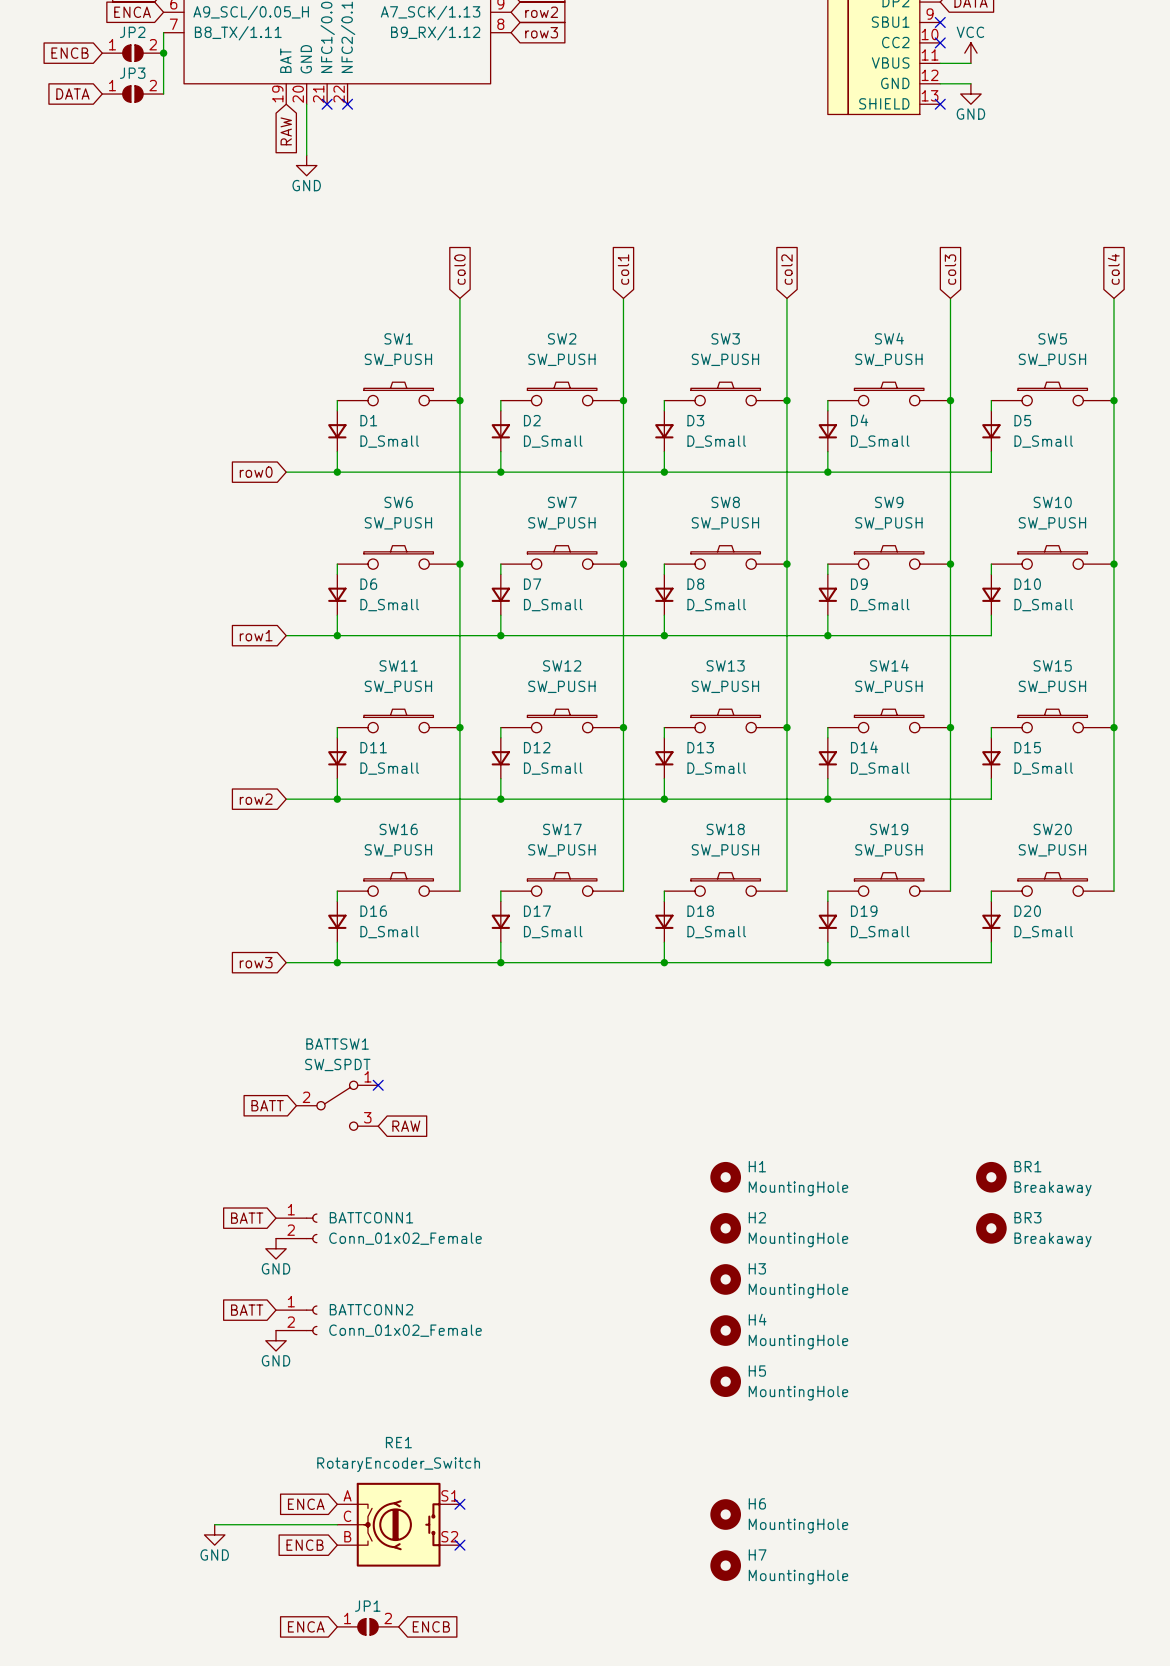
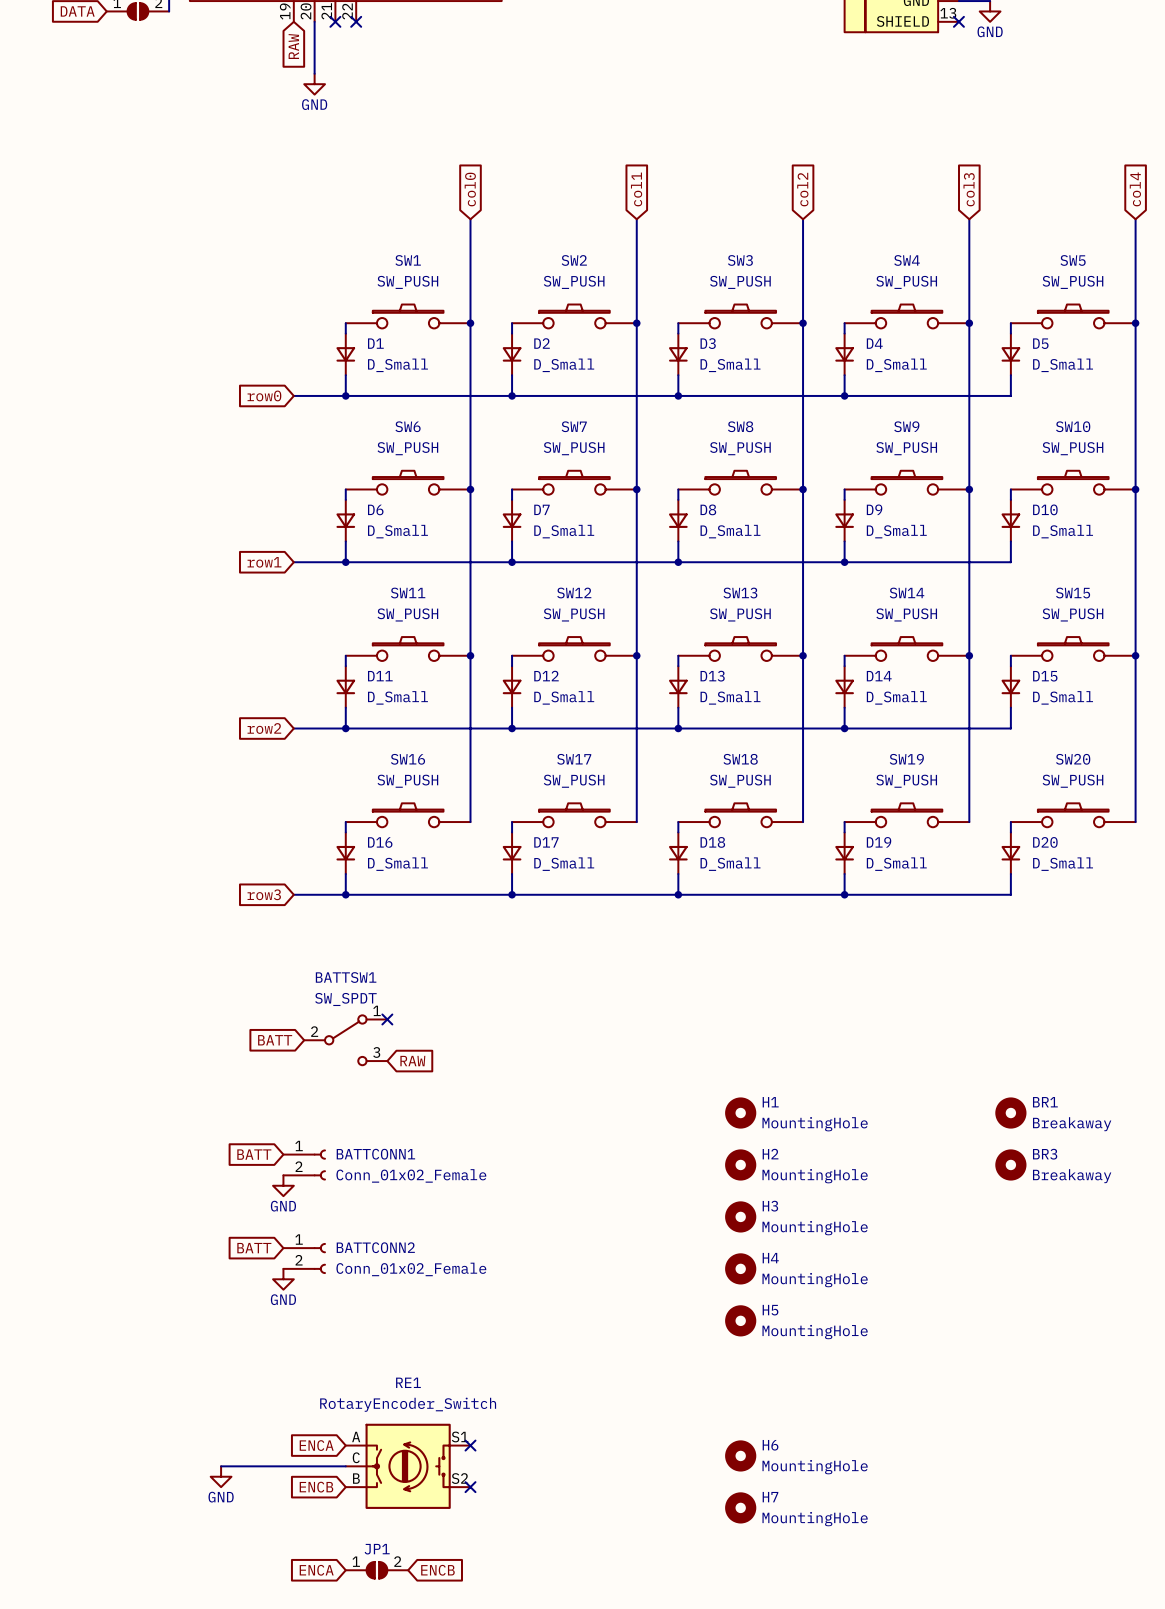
RE1 symbol: [337, 1482, 460, 1567] -> [345, 1423, 471, 1509]

